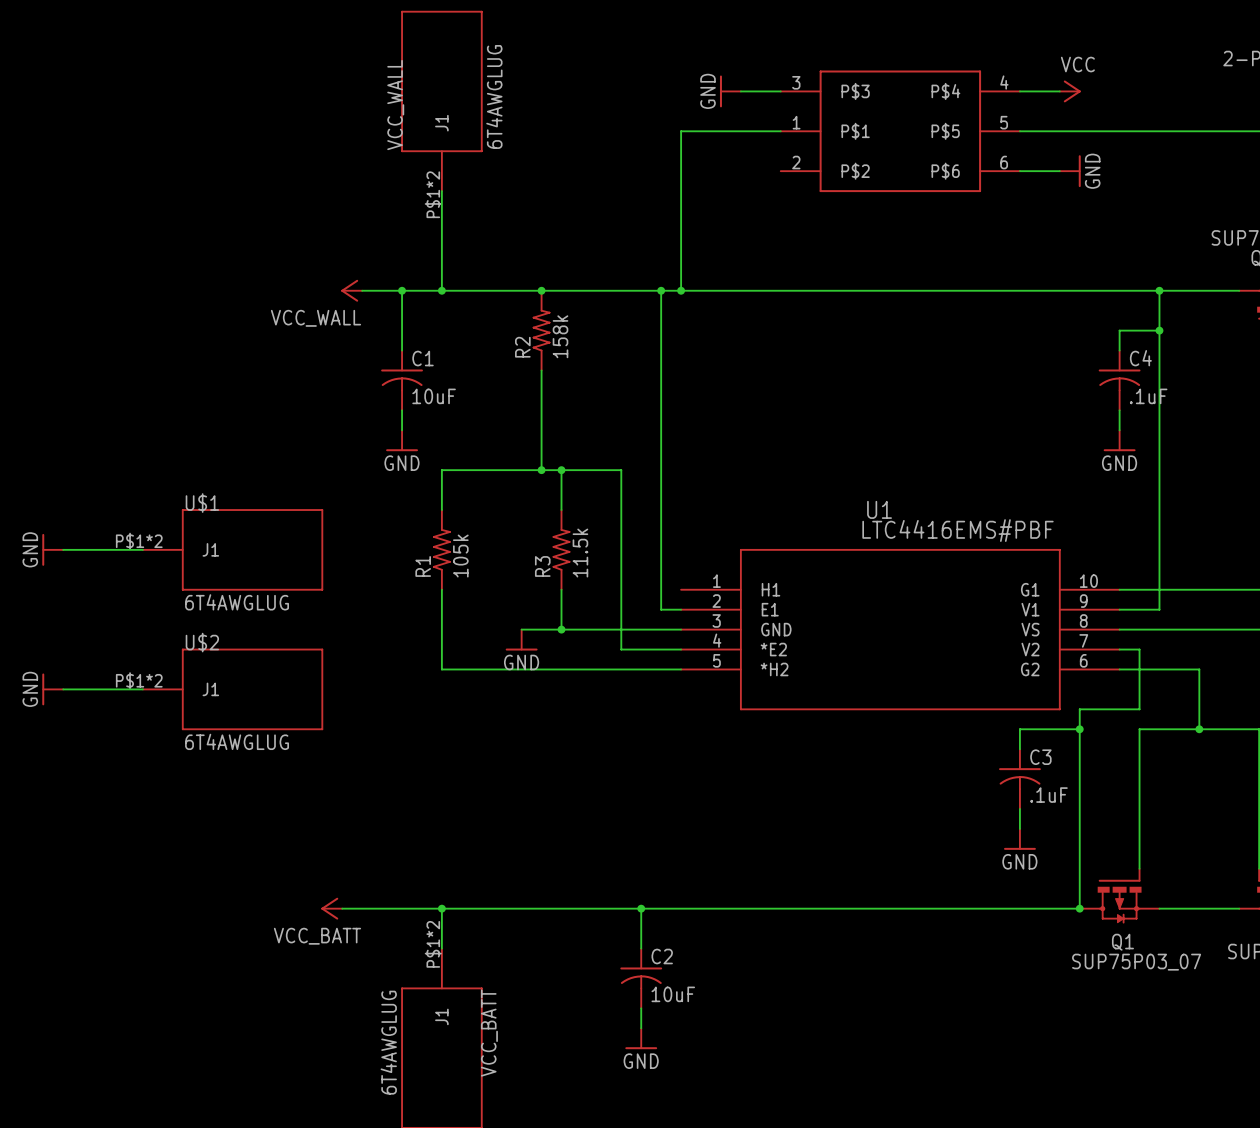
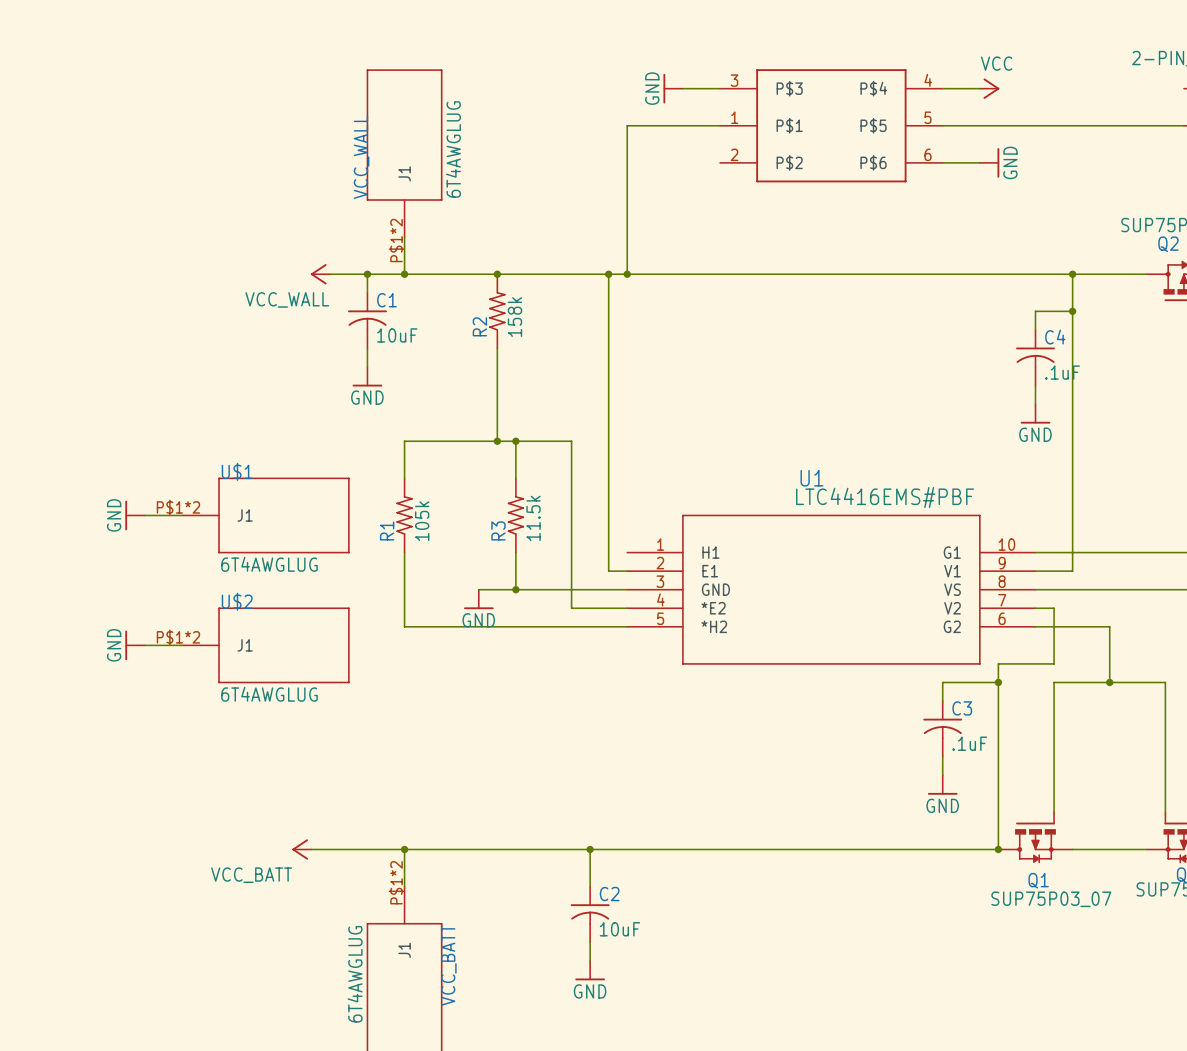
VCC_WALL position: (441, 101) -> (404, 153)
C1 position: (402, 380) -> (367, 320)
power symbol position: GND (402, 440) -> GND (367, 376)
power symbol: GND (52, 549) -> none
wire: (63, 549) (142, 549) -> none
power symbol: none -> GND (135, 515)
U$1 position: (232, 549) -> (265, 515)
power symbol: GND (52, 689) -> none
wire: (63, 689) (142, 689) -> none
power symbol: none -> GND (135, 645)
U$2 position: (232, 689) -> (265, 645)
power symbol text position: VCC_BATT (317, 936) -> VCC_BATT (251, 875)

